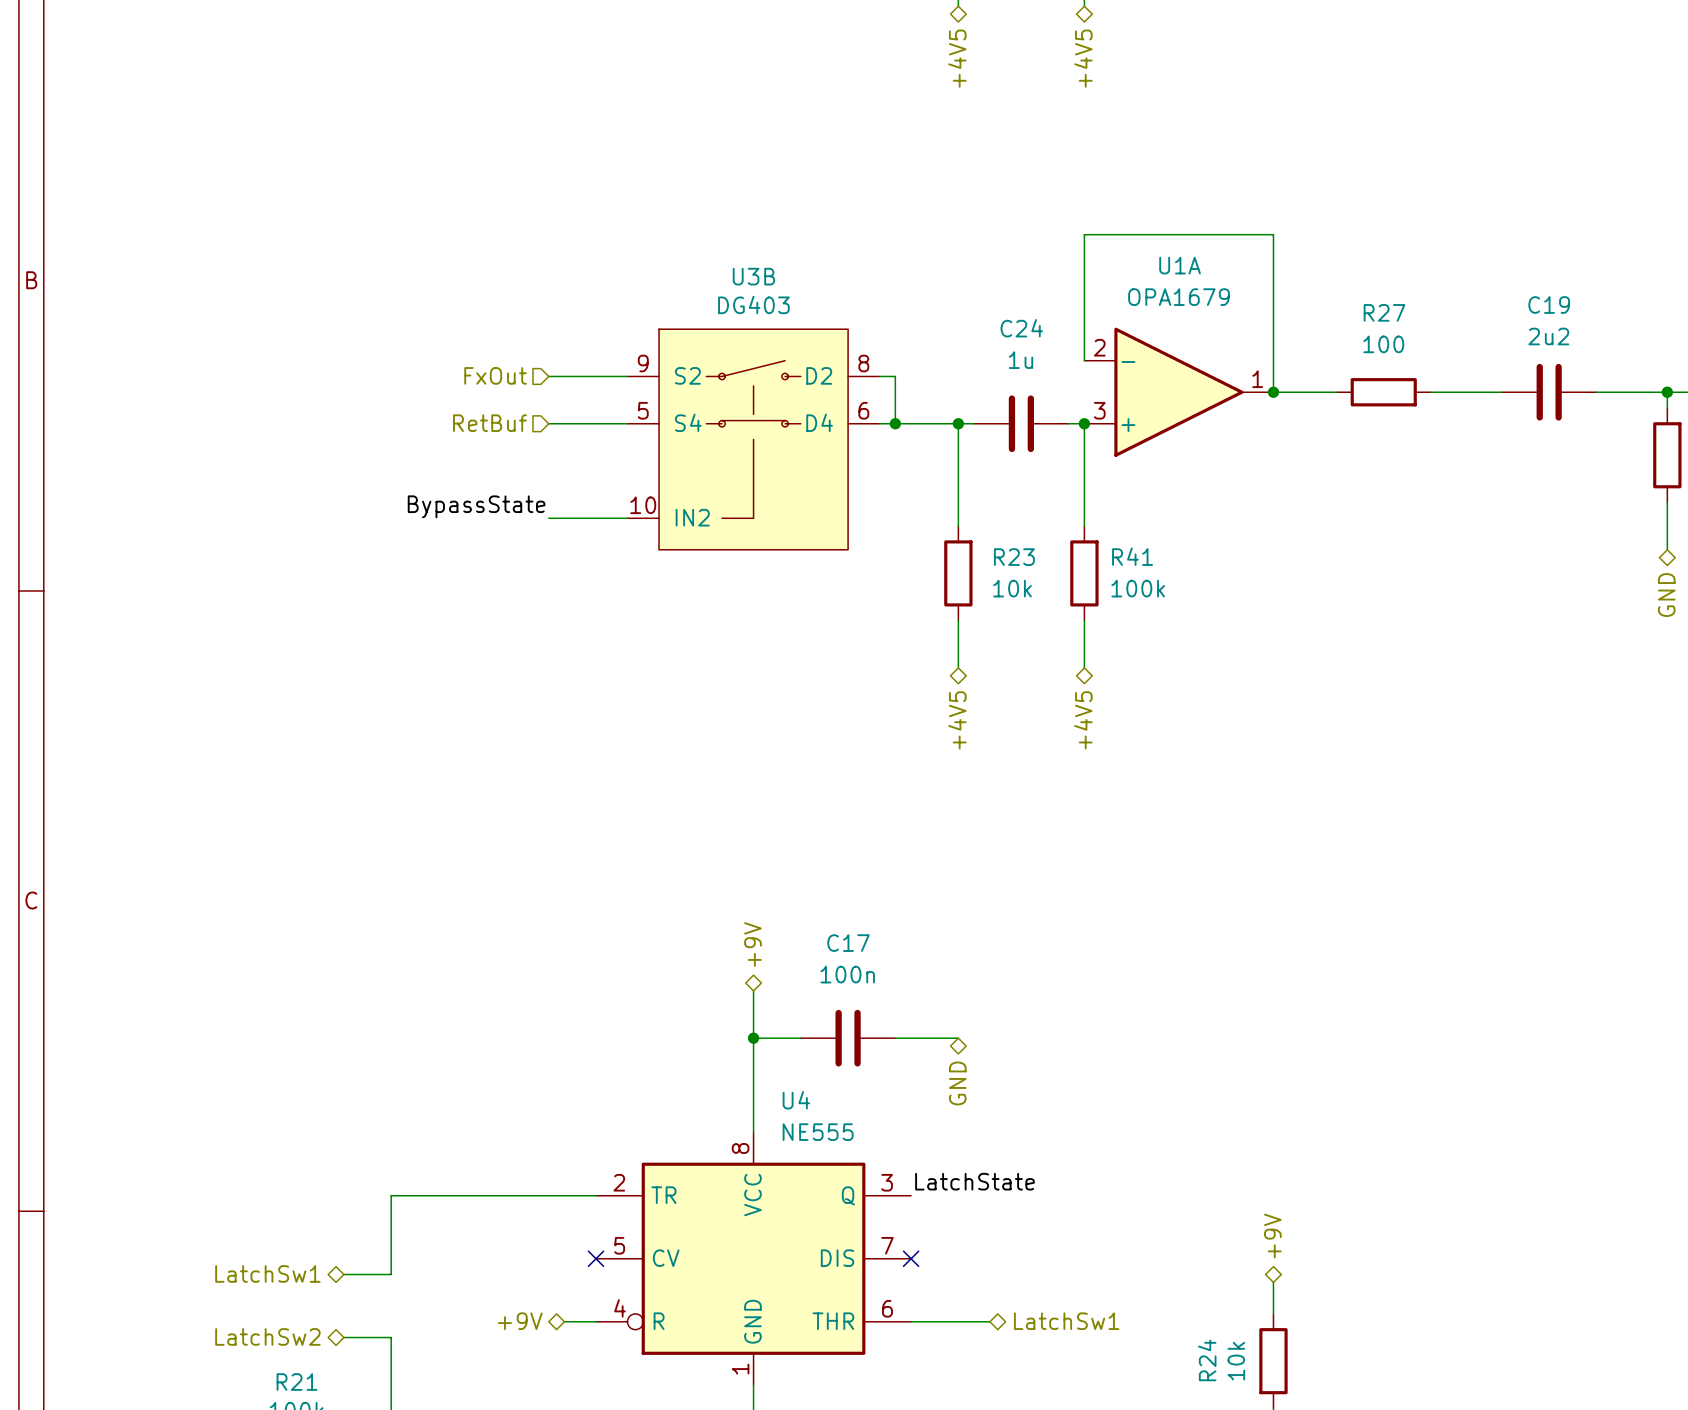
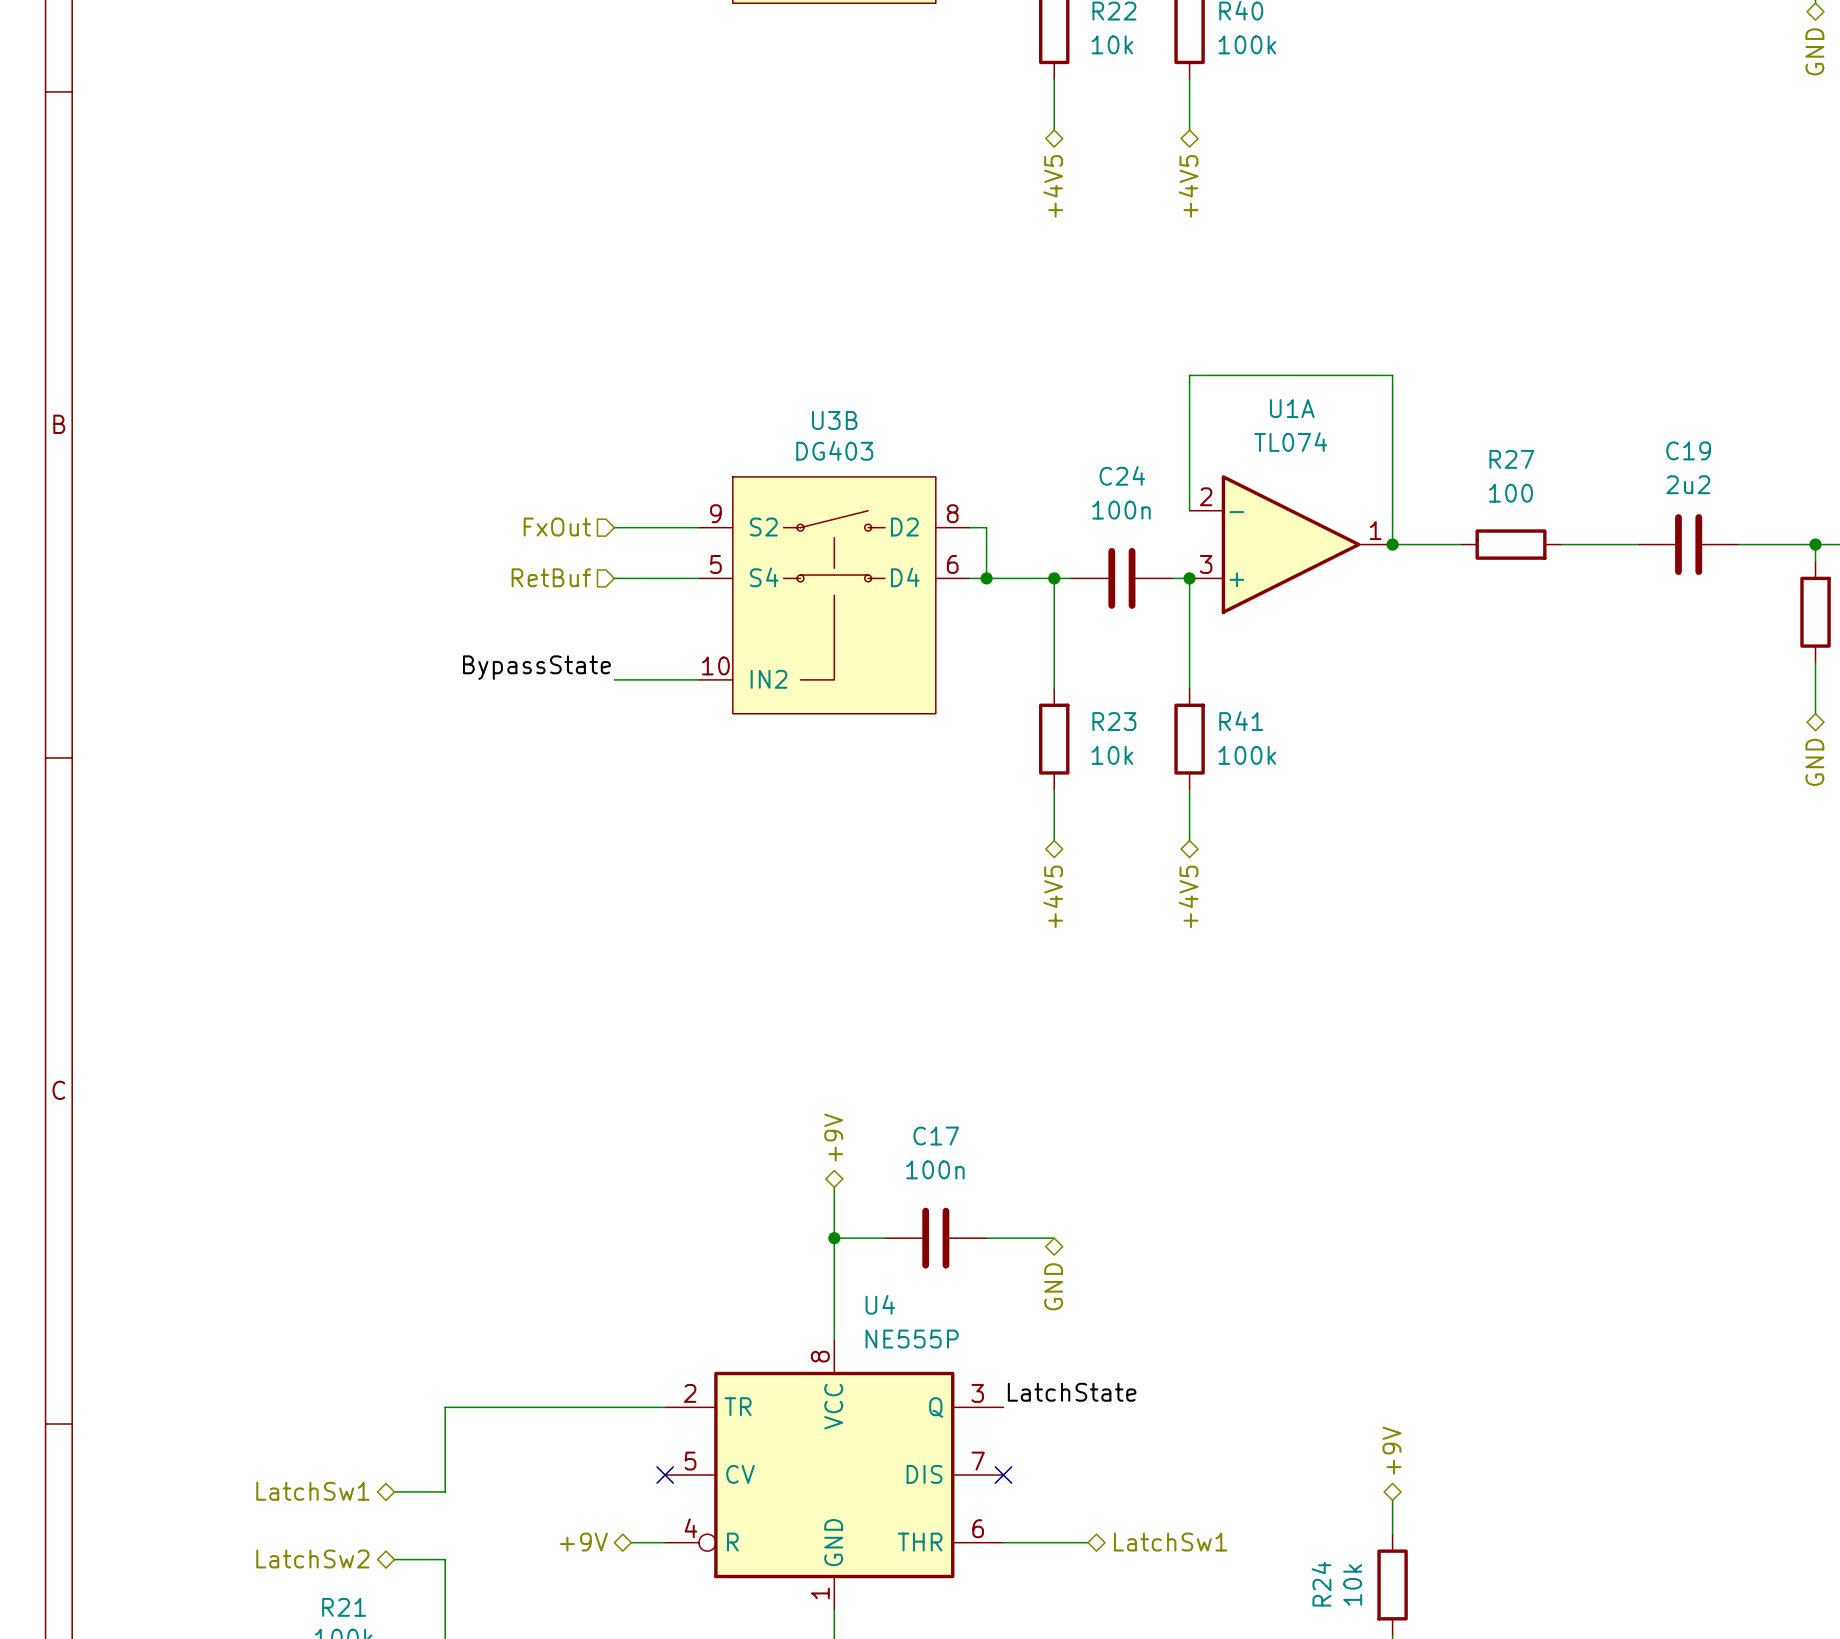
U1A value: OPA1679 (1178, 297) -> TL074 (1290, 442)
C24 value: 1u (1021, 360) -> 100n (1121, 510)
U4 value: NE555 (818, 1132) -> NE555P (912, 1339)

